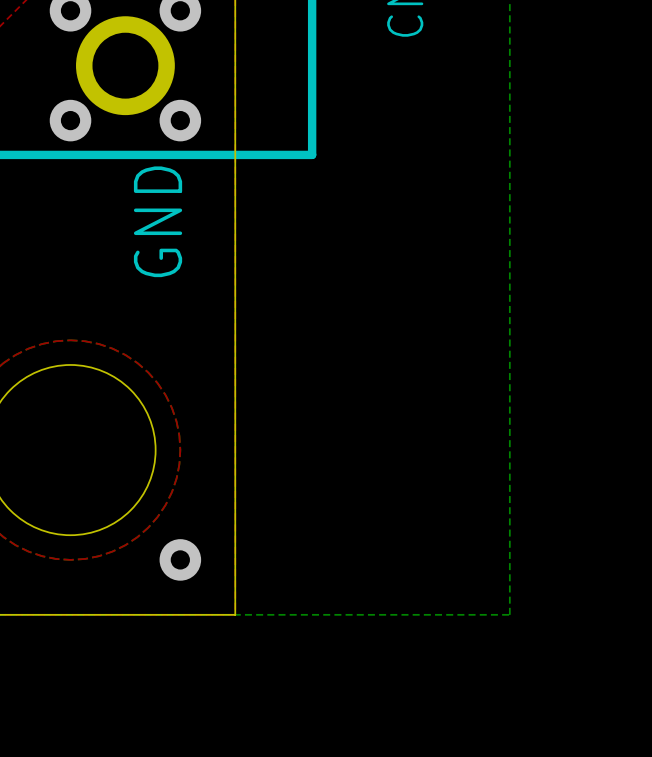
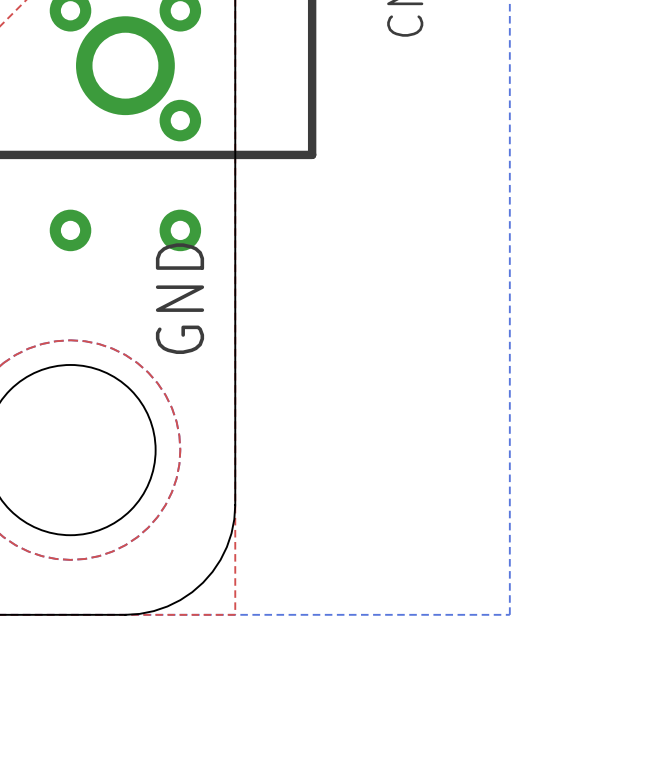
via: (70, 120) -> none
text position: GND (158, 221) -> GND (179, 298)
via: none -> (70, 230)
via: none -> (180, 230)
board edge: (235, 505) (235, 614) (125, 614) -> (235, 505) (231, 533) (226, 547) (220, 559) (203, 582) (180, 600) (167, 606) (153, 611) (125, 614)
via: (180, 559) -> none

